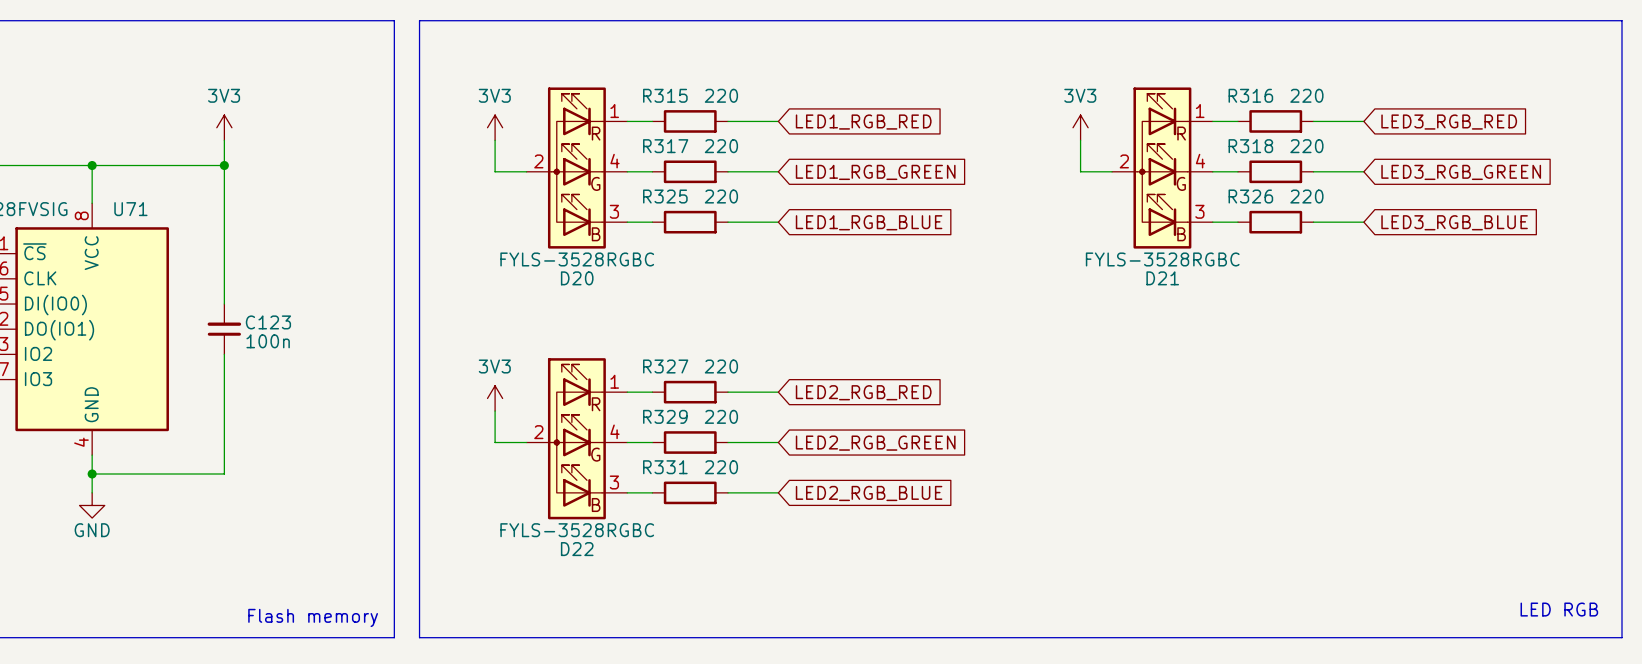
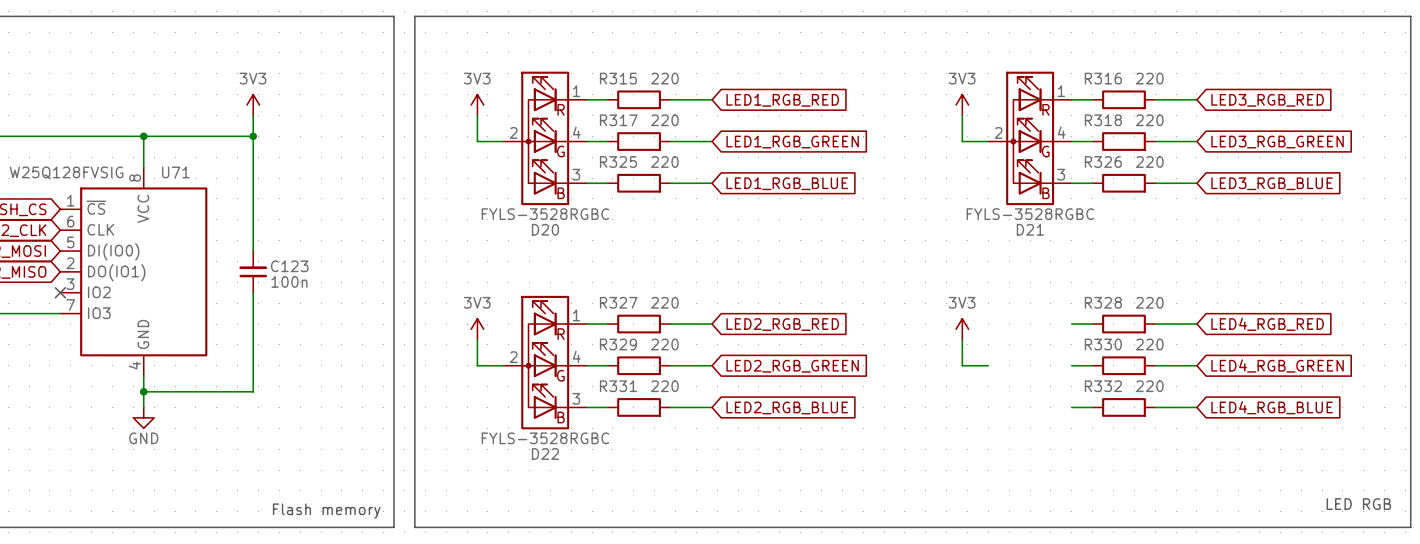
wire: none -> (1071, 324) (1092, 324)
R328: none -> 220 (1123, 324)
wire: none -> (1155, 324) (1196, 324)
global label: none -> LED4_RGB_RED (1267, 324)
power symbol: none -> 3V3 (962, 329)
wire: none -> (962, 339) (962, 365) (988, 365)
wire: none -> (1071, 365) (1092, 365)
R330: none -> 220 (1123, 365)
wire: none -> (1155, 365) (1196, 365)
global label: none -> LED4_RGB_GREEN (1277, 365)
wire: none -> (1071, 407) (1092, 407)
R332: none -> 220 (1123, 407)
wire: none -> (1155, 407) (1196, 407)
global label: none -> LED4_RGB_BLUE (1272, 407)

